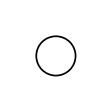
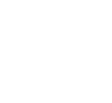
round board edge: [35, 35, 77, 77] -> none

